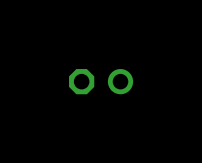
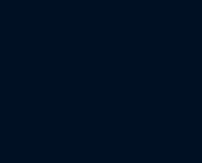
part: (101, 81) -> none

